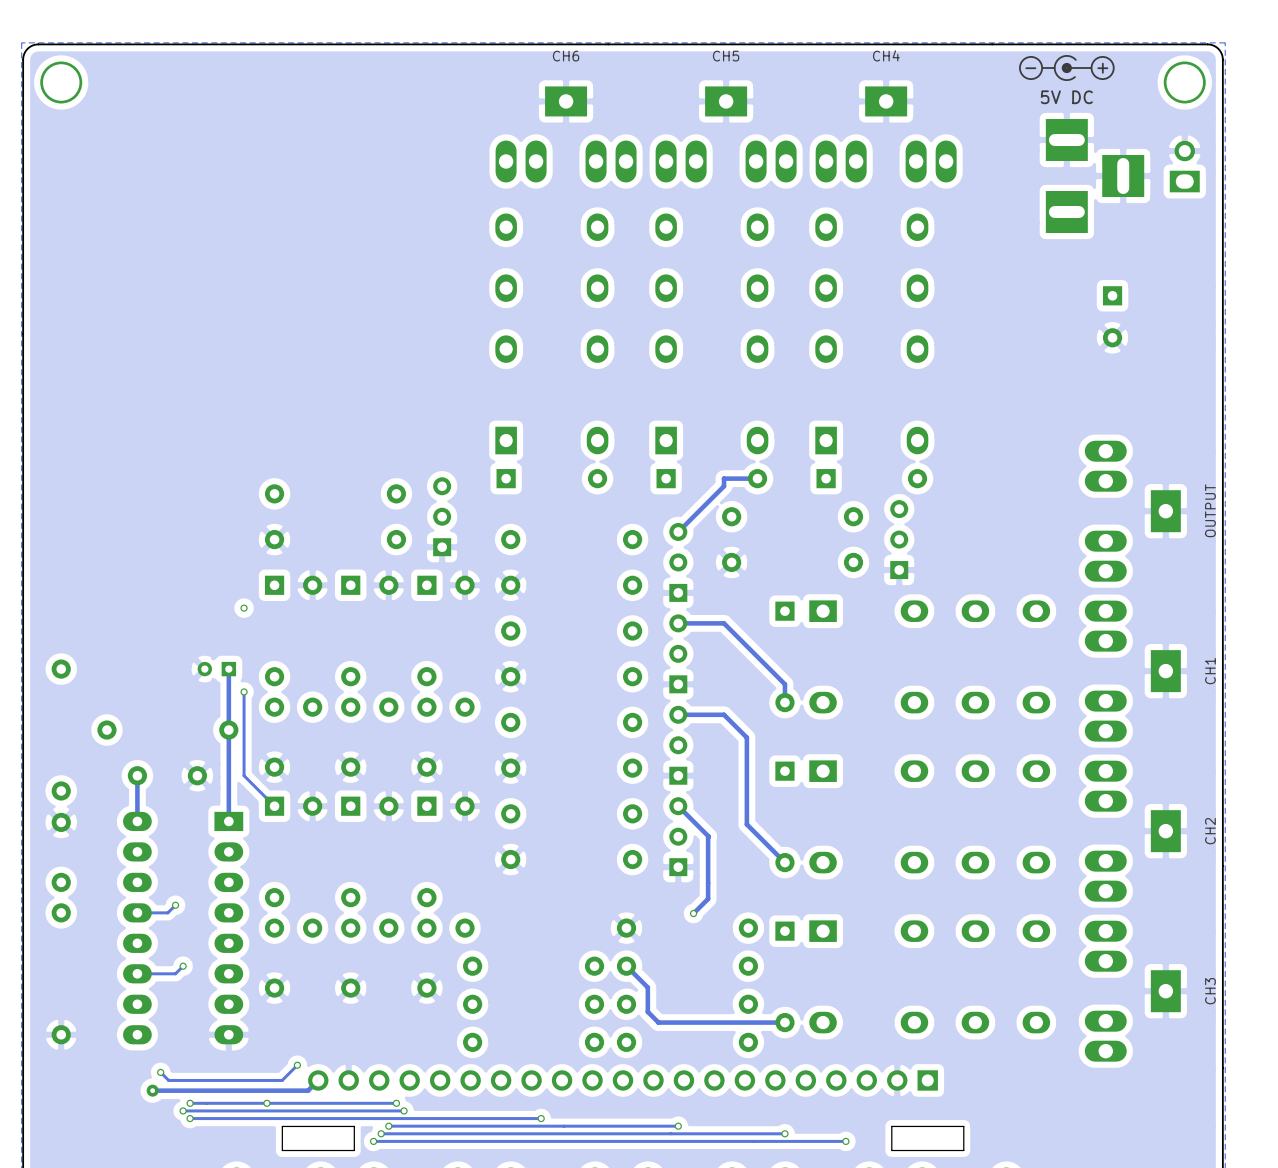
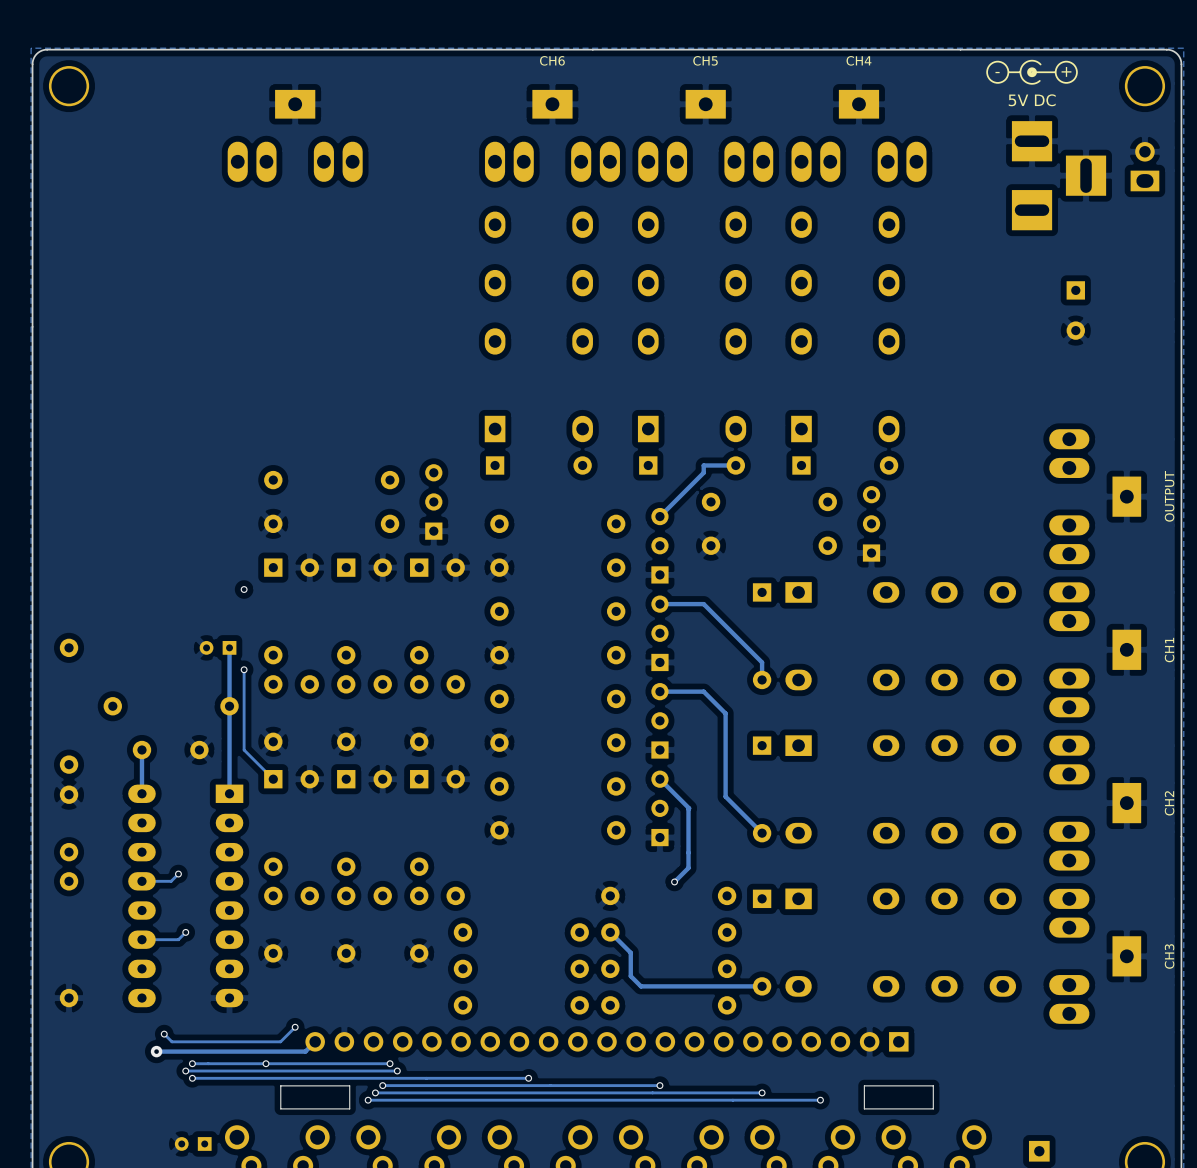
part: none -> (295, 135)

